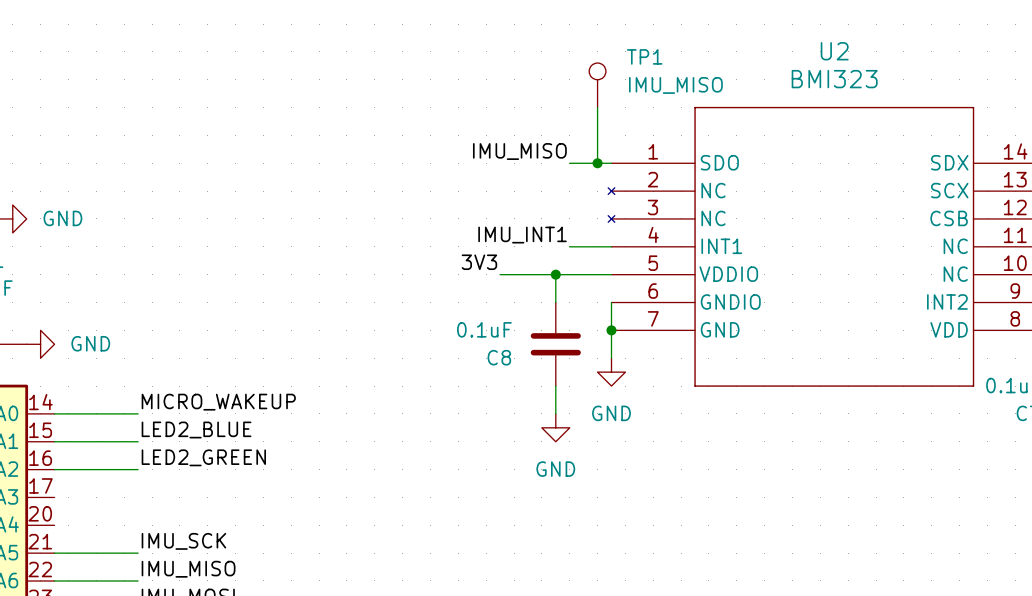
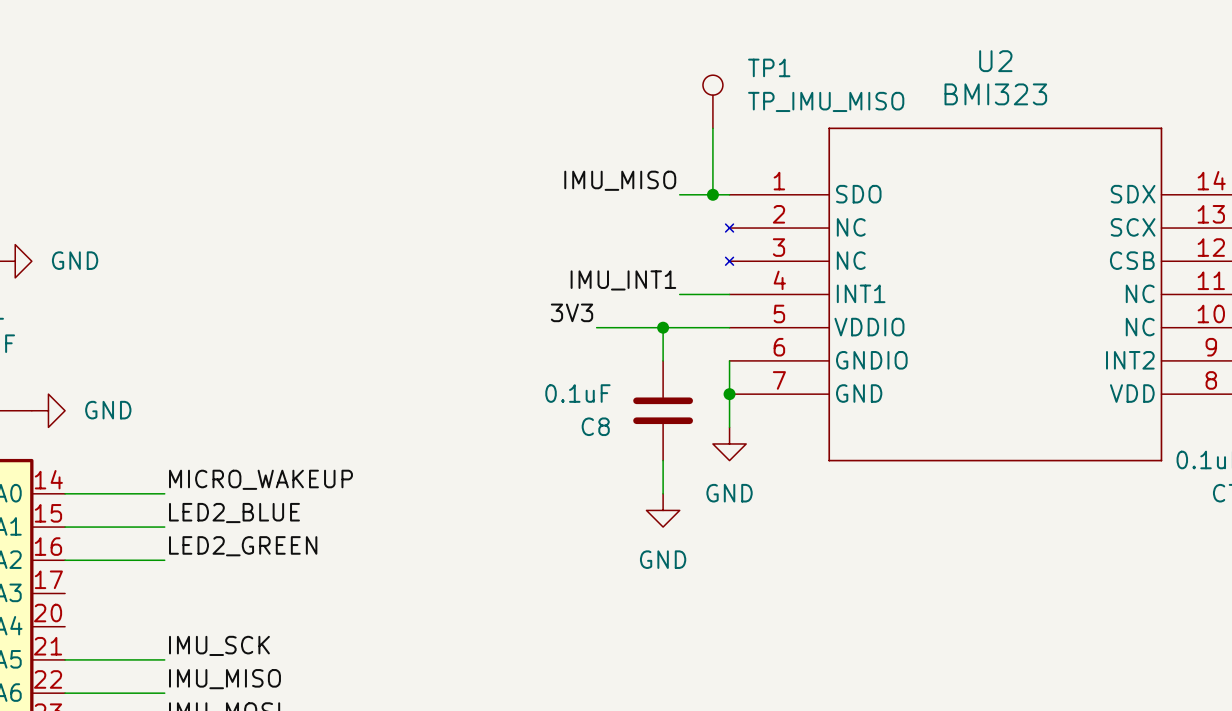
TP1 value: IMU_MISO (675, 85) -> TP_IMU_MISO (826, 101)

